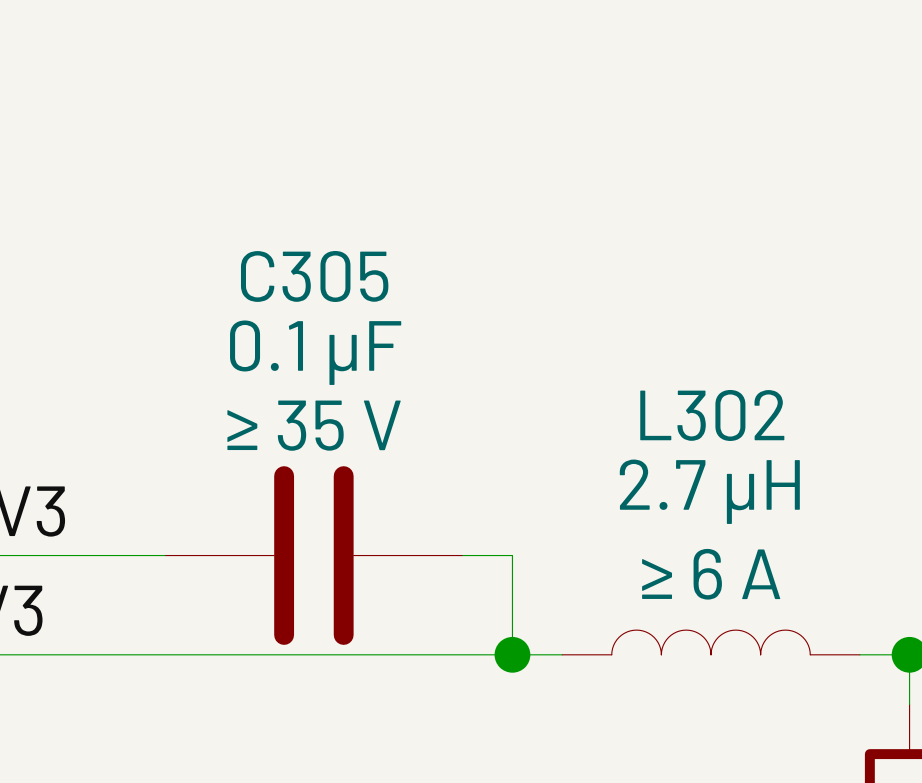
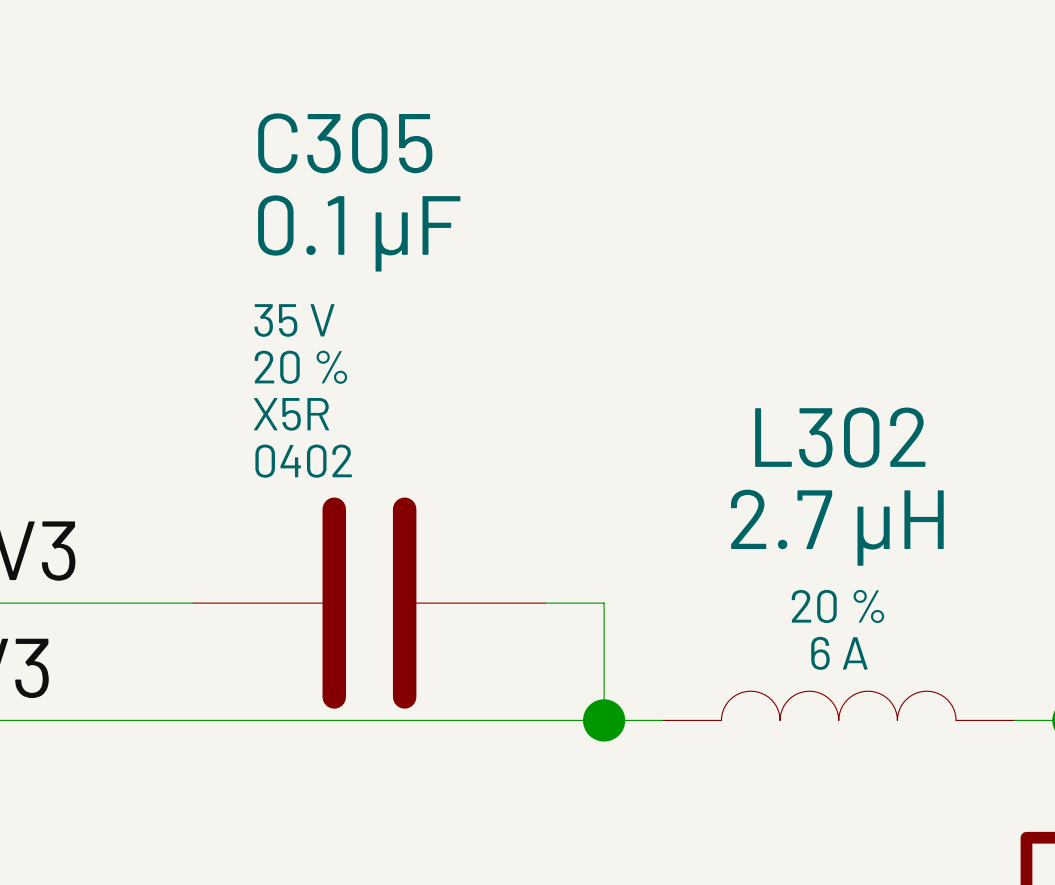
C305 name position: C305 (314, 276) -> C305 (345, 143)
C305 value position: 0.1 µF (315, 352) -> 0.1 µF (359, 233)
C305 text: none -> 20 % (300, 367)
C305 text: none -> X5R (291, 414)
C305 text: ≥ 35 V (314, 425) -> 35 V (294, 320)
C305 text: none -> 0402 (303, 461)
L302 text: none -> 20 % (837, 606)
L302 text: ≥ 6 A (711, 574) -> 6 A (839, 653)

